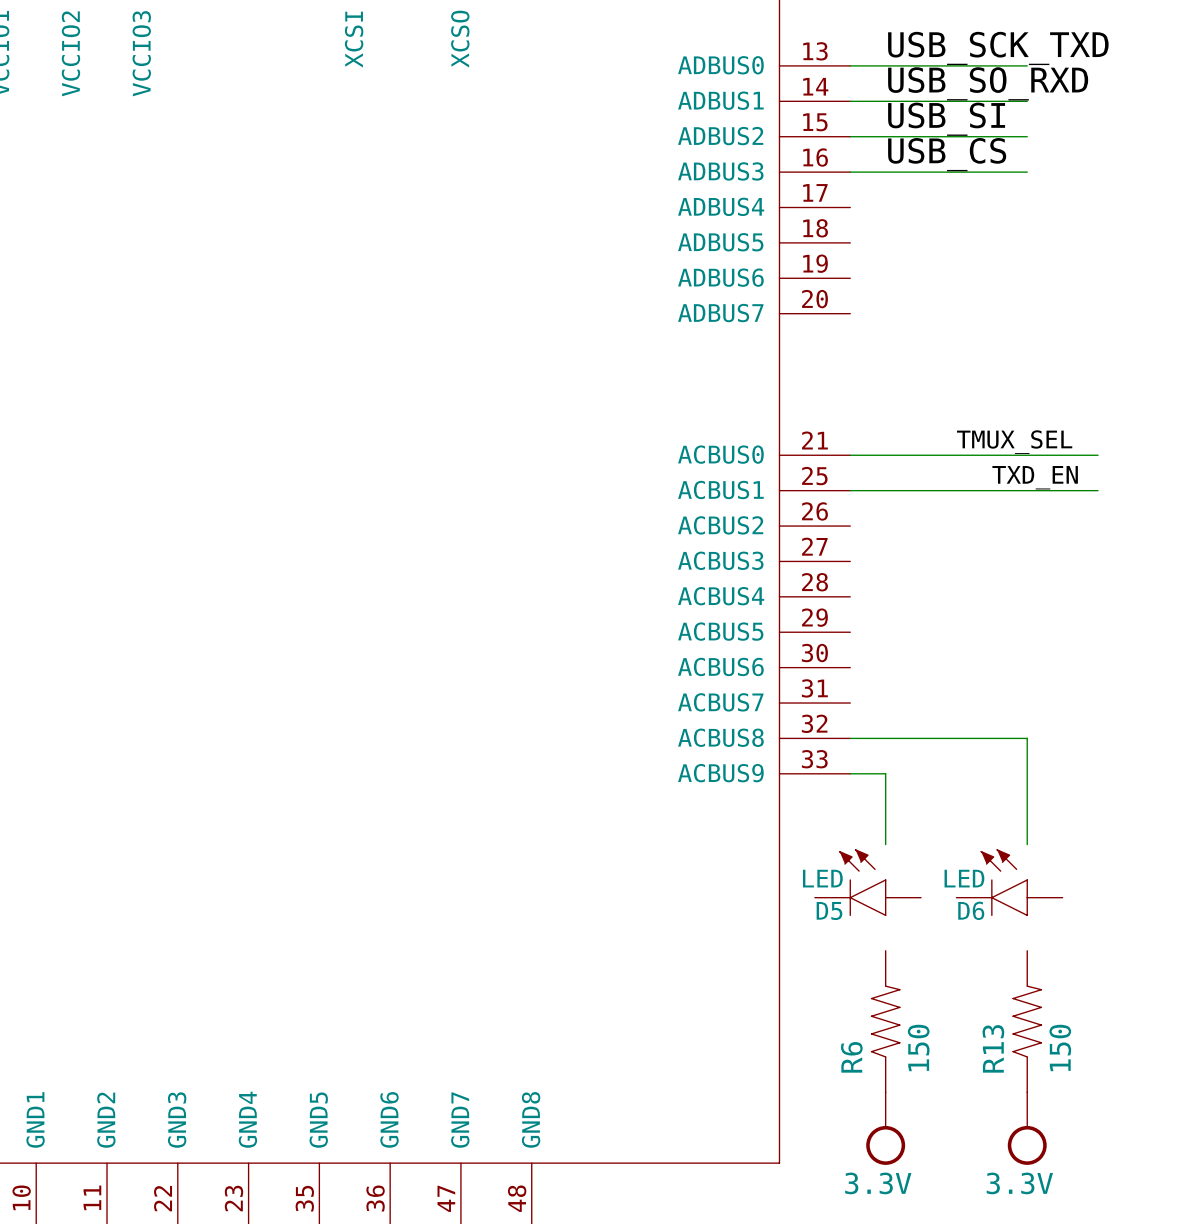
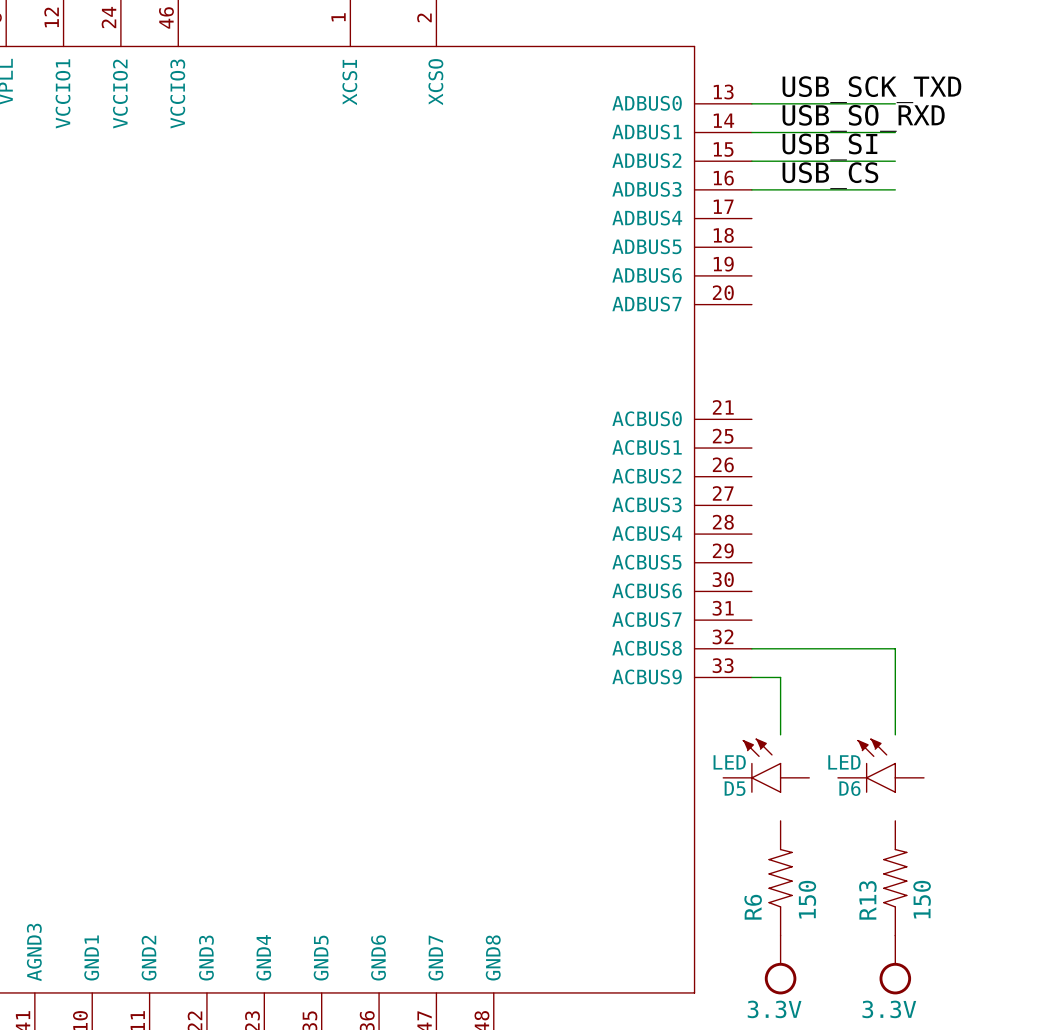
label: TMUX_SEL (1014, 442) -> none
wire: (850, 455) (1098, 455) -> none
label: TXD_EN (1035, 477) -> none
wire: (850, 490) (1098, 490) -> none

